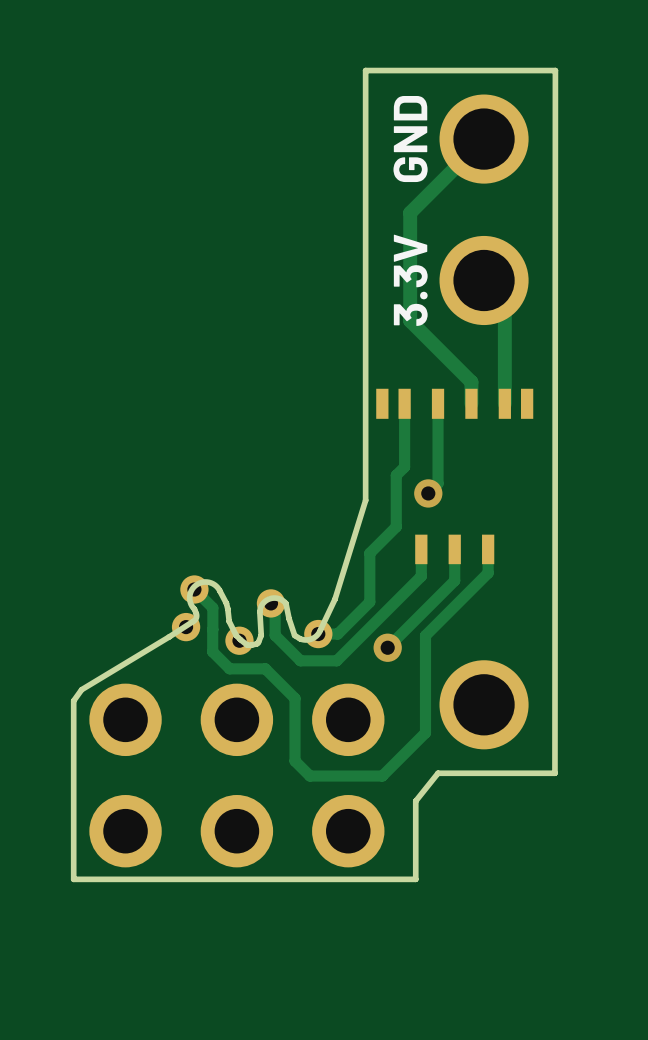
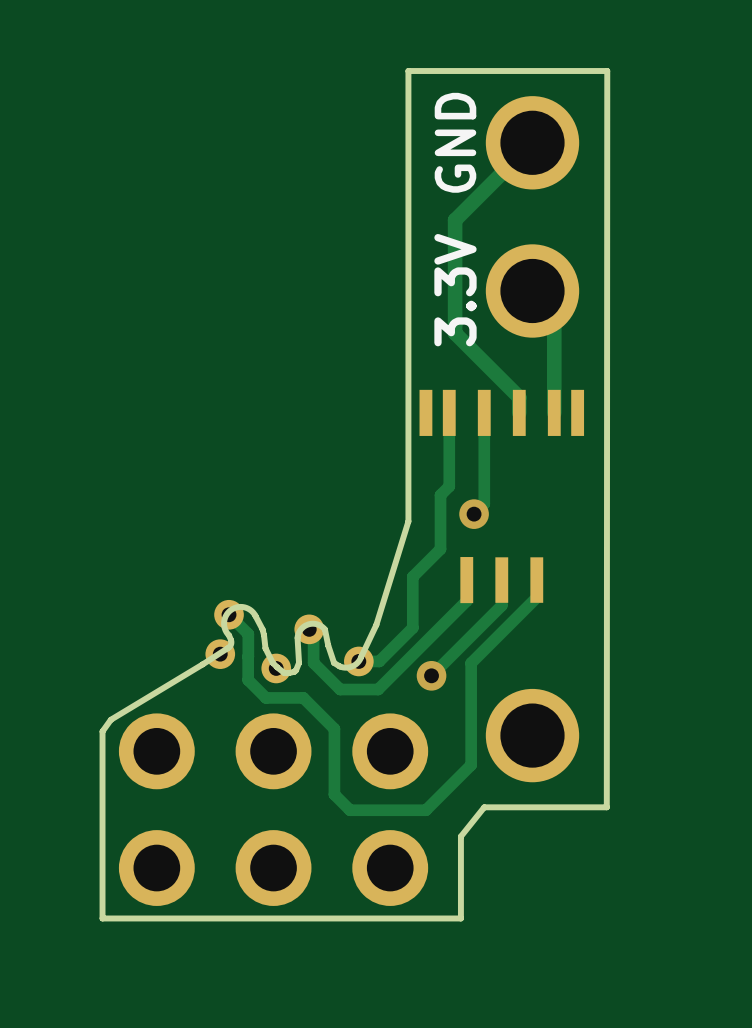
part footprint: [376, 388, 534, 565] -> [419, 389, 585, 604]

